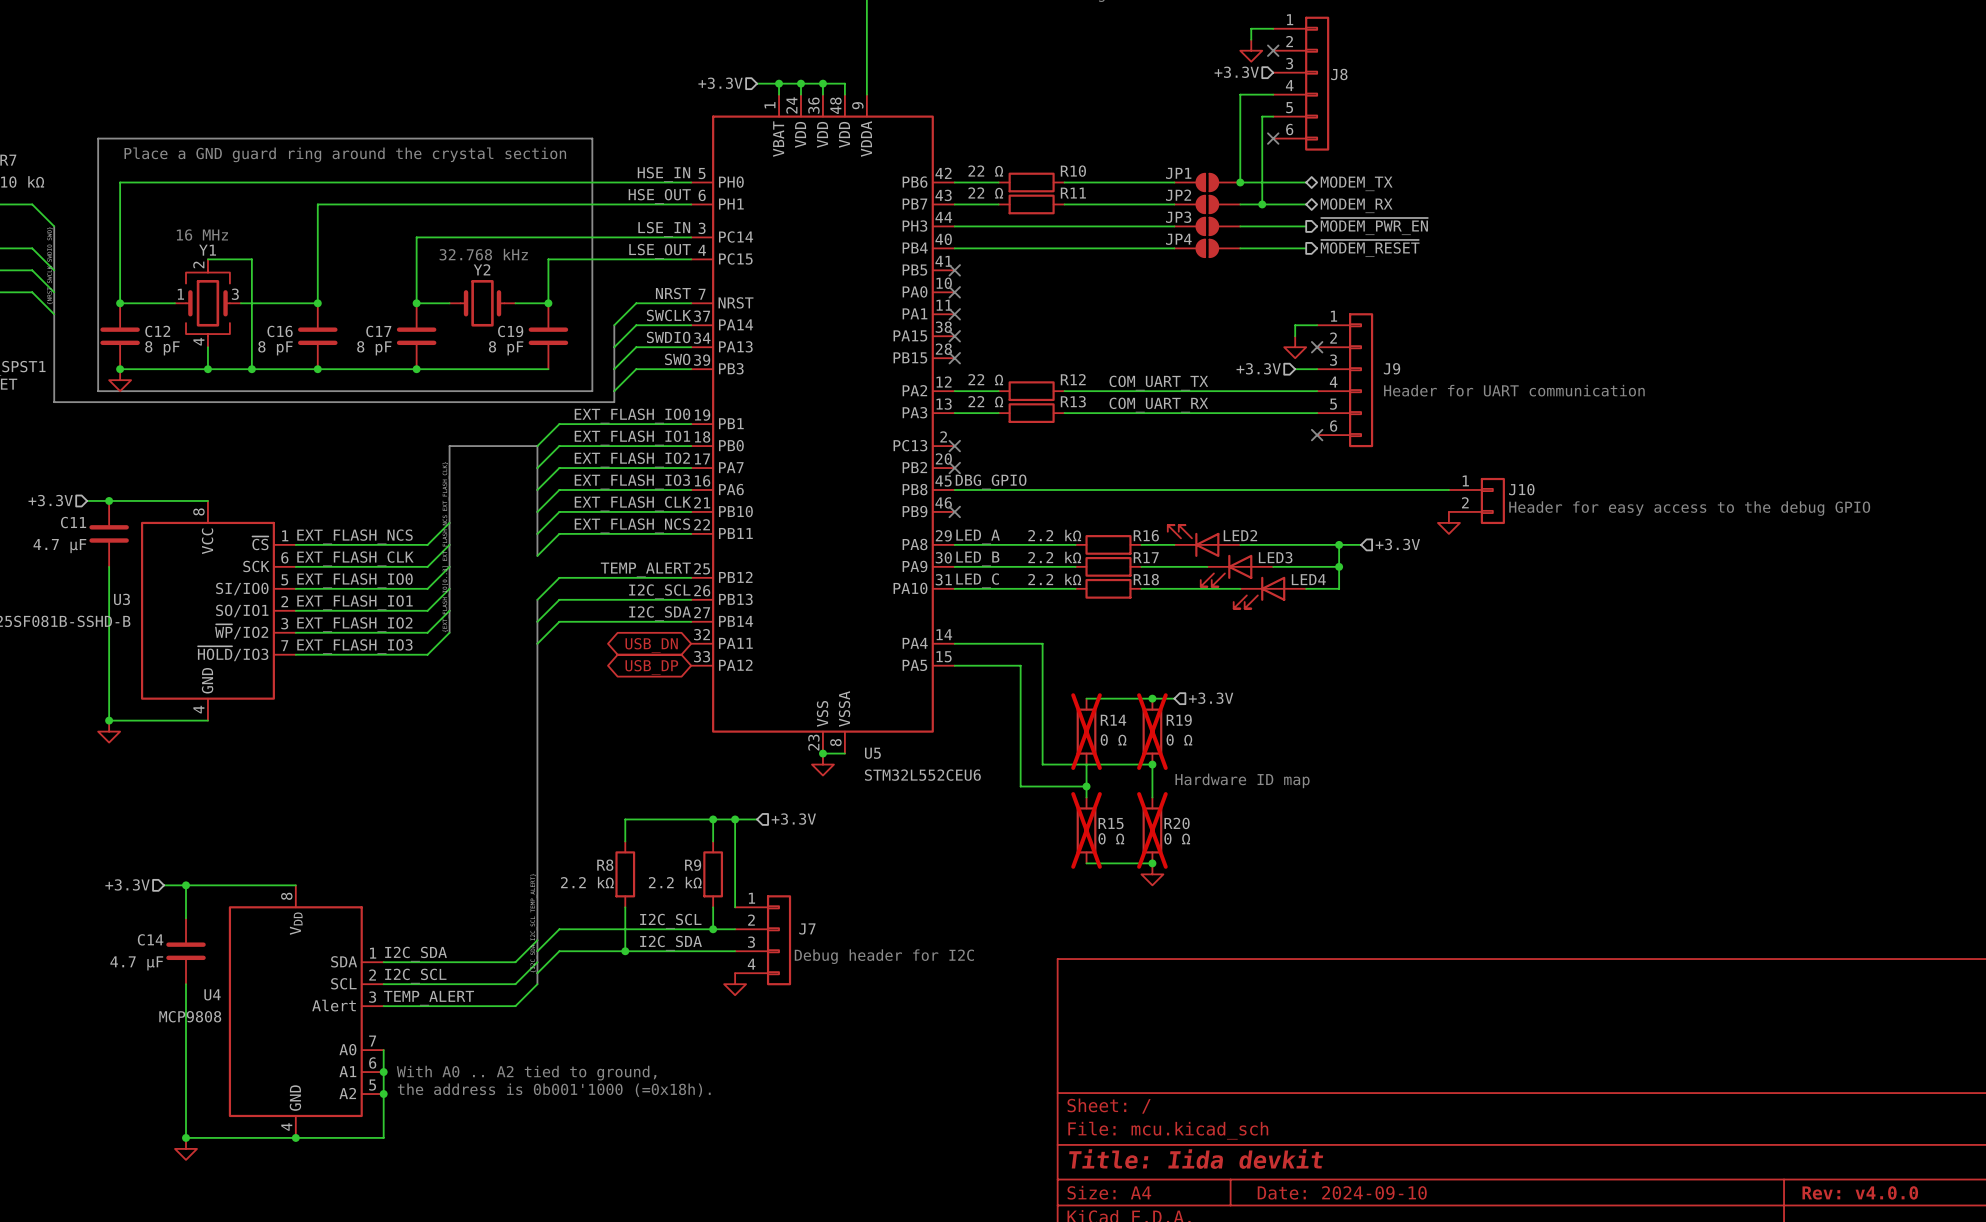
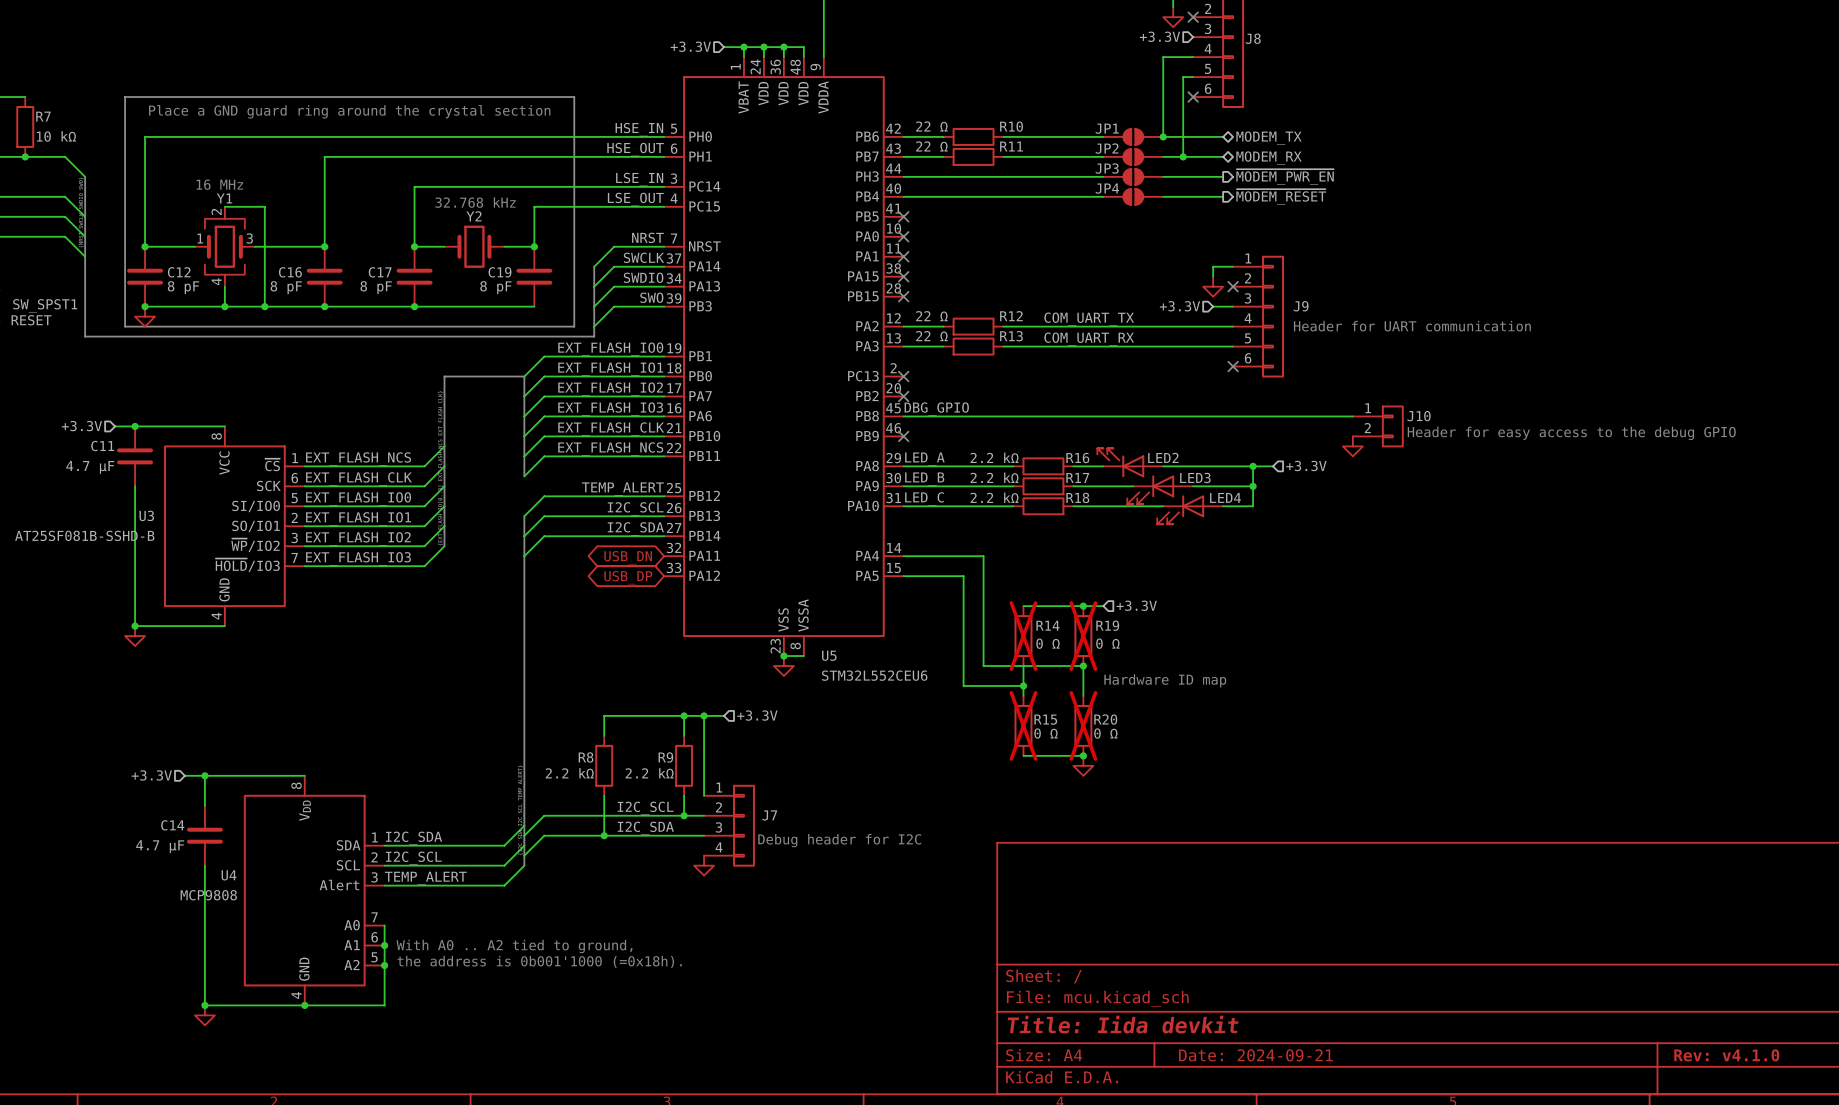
title block: Date: 2024-09-10 (1342, 1192) -> Date: 2024-09-21 (1255, 1055)
title block: Rev: v4.0.0 (1860, 1192) -> Rev: v4.1.0 (1726, 1055)

